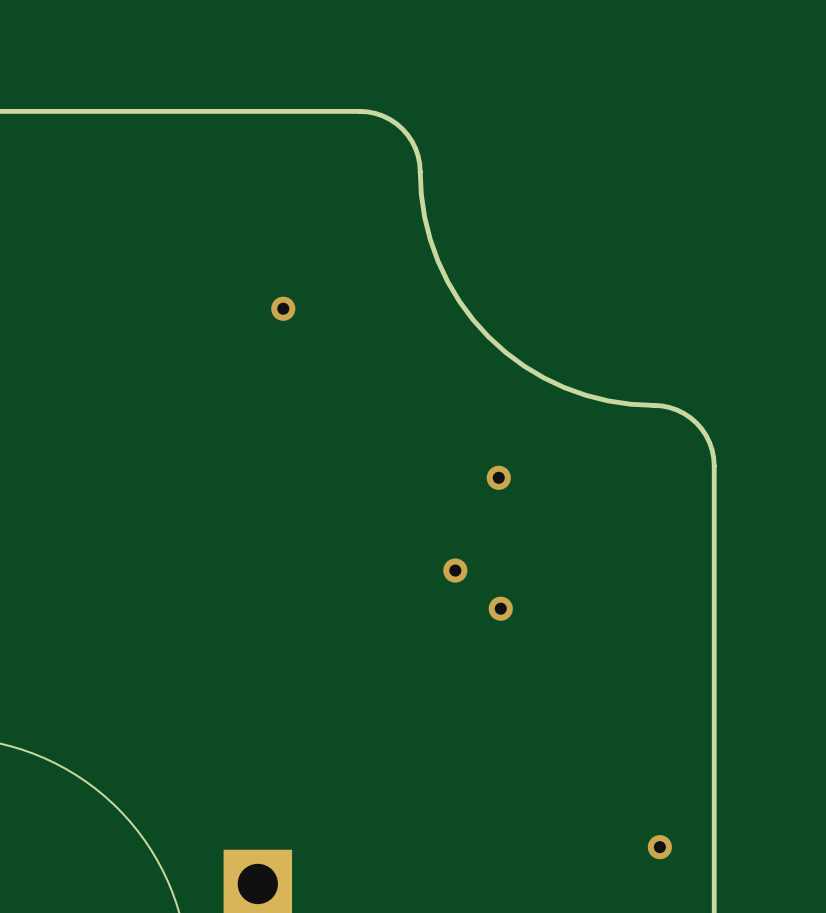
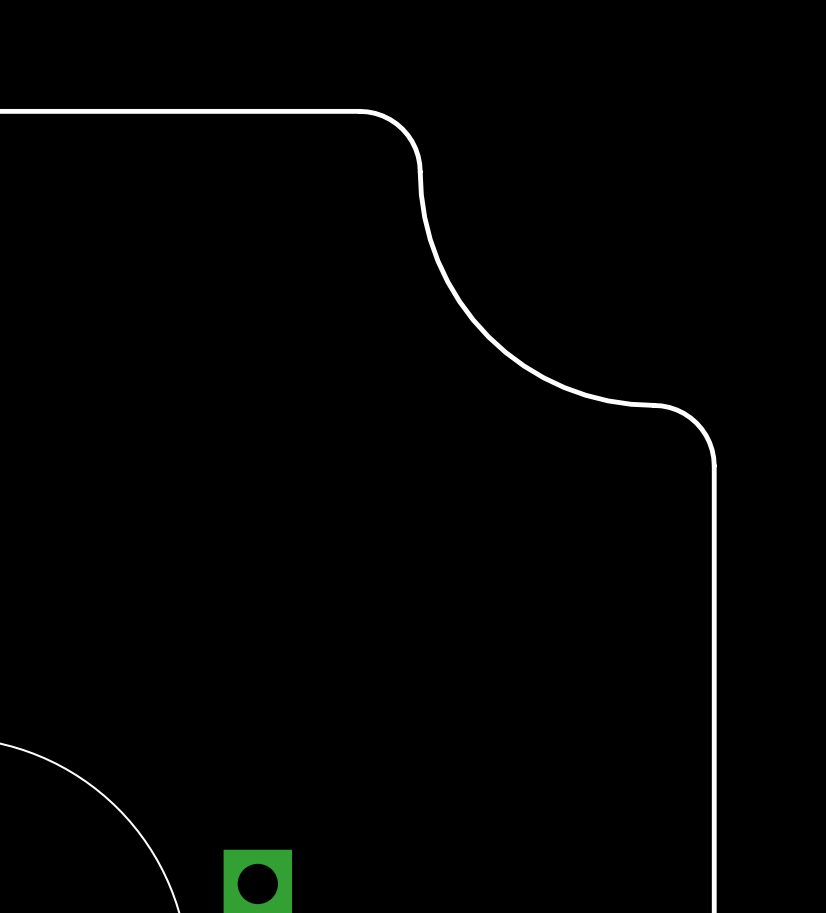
via: (283, 308) -> none
via: (498, 477) -> none
via: (455, 570) -> none
via: (500, 608) -> none
via: (659, 847) -> none

